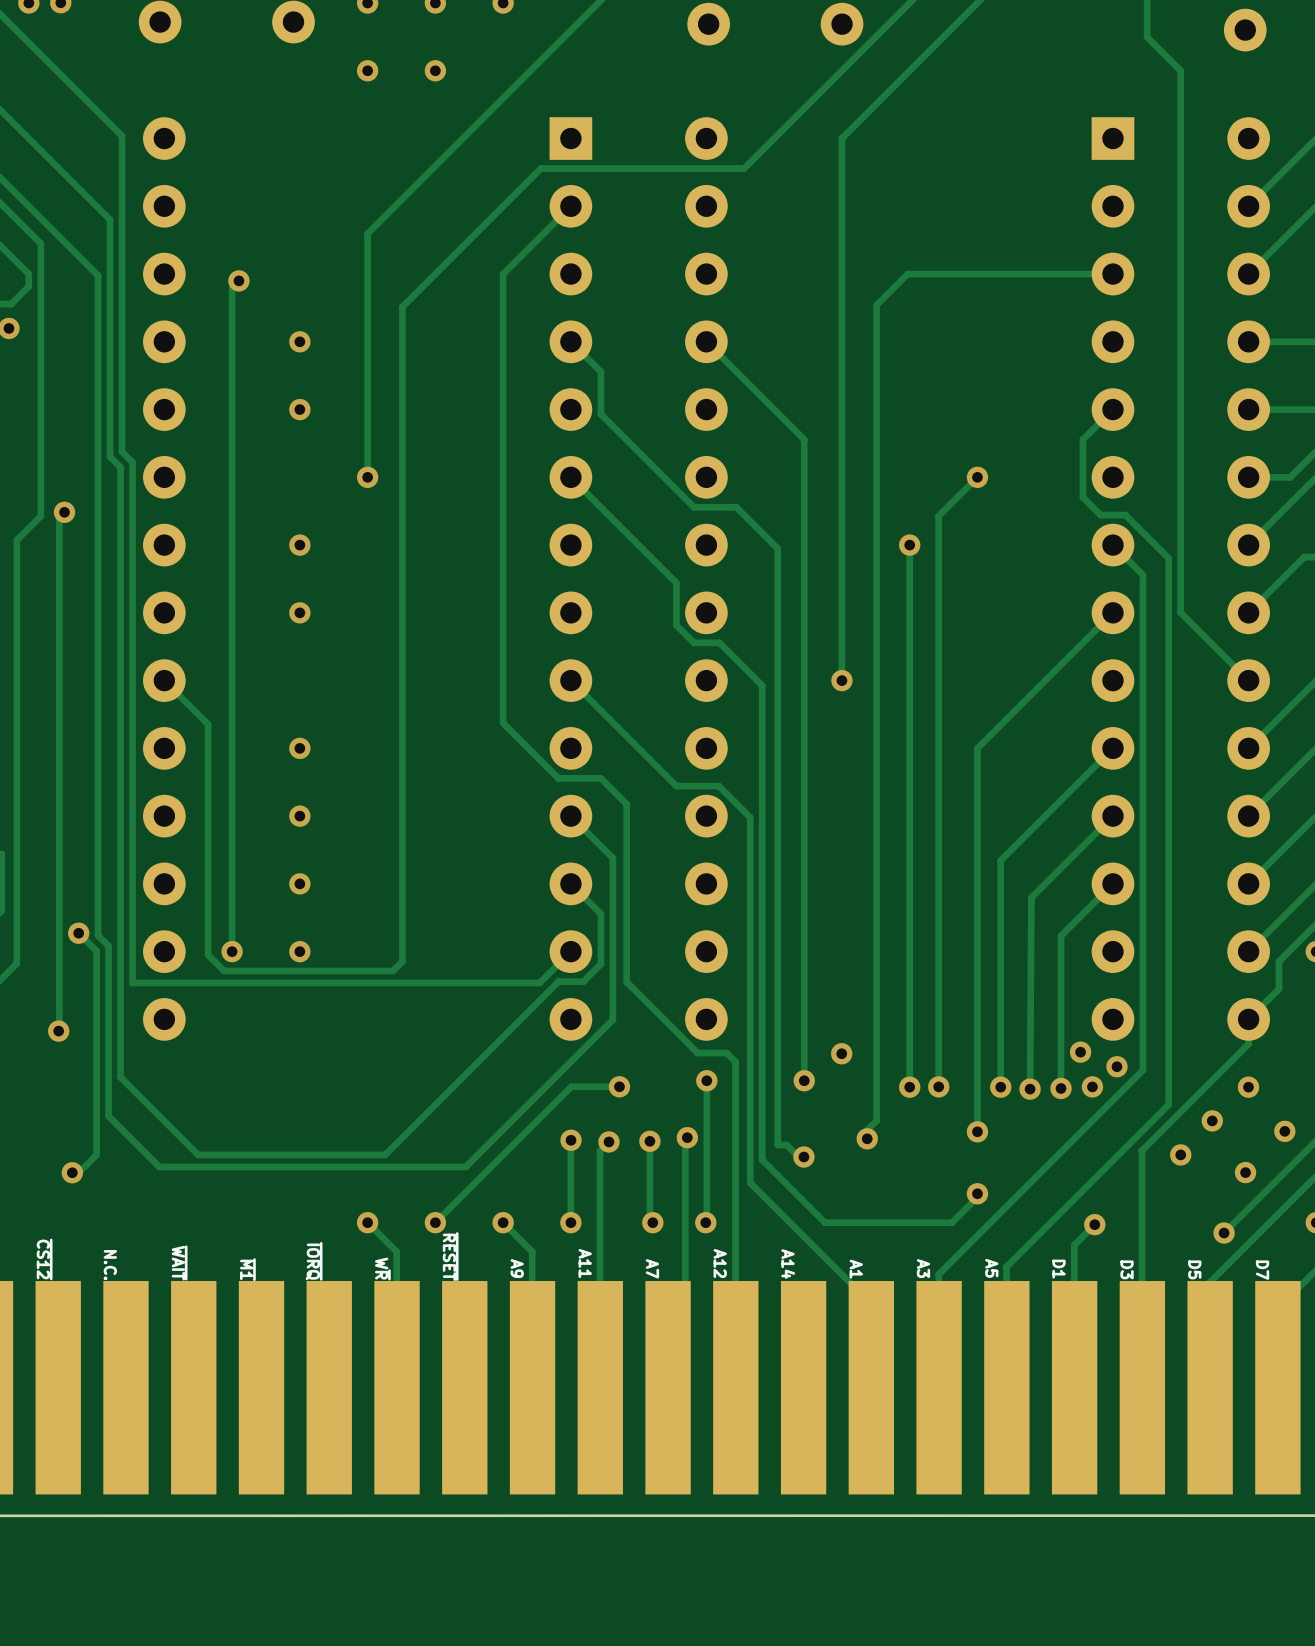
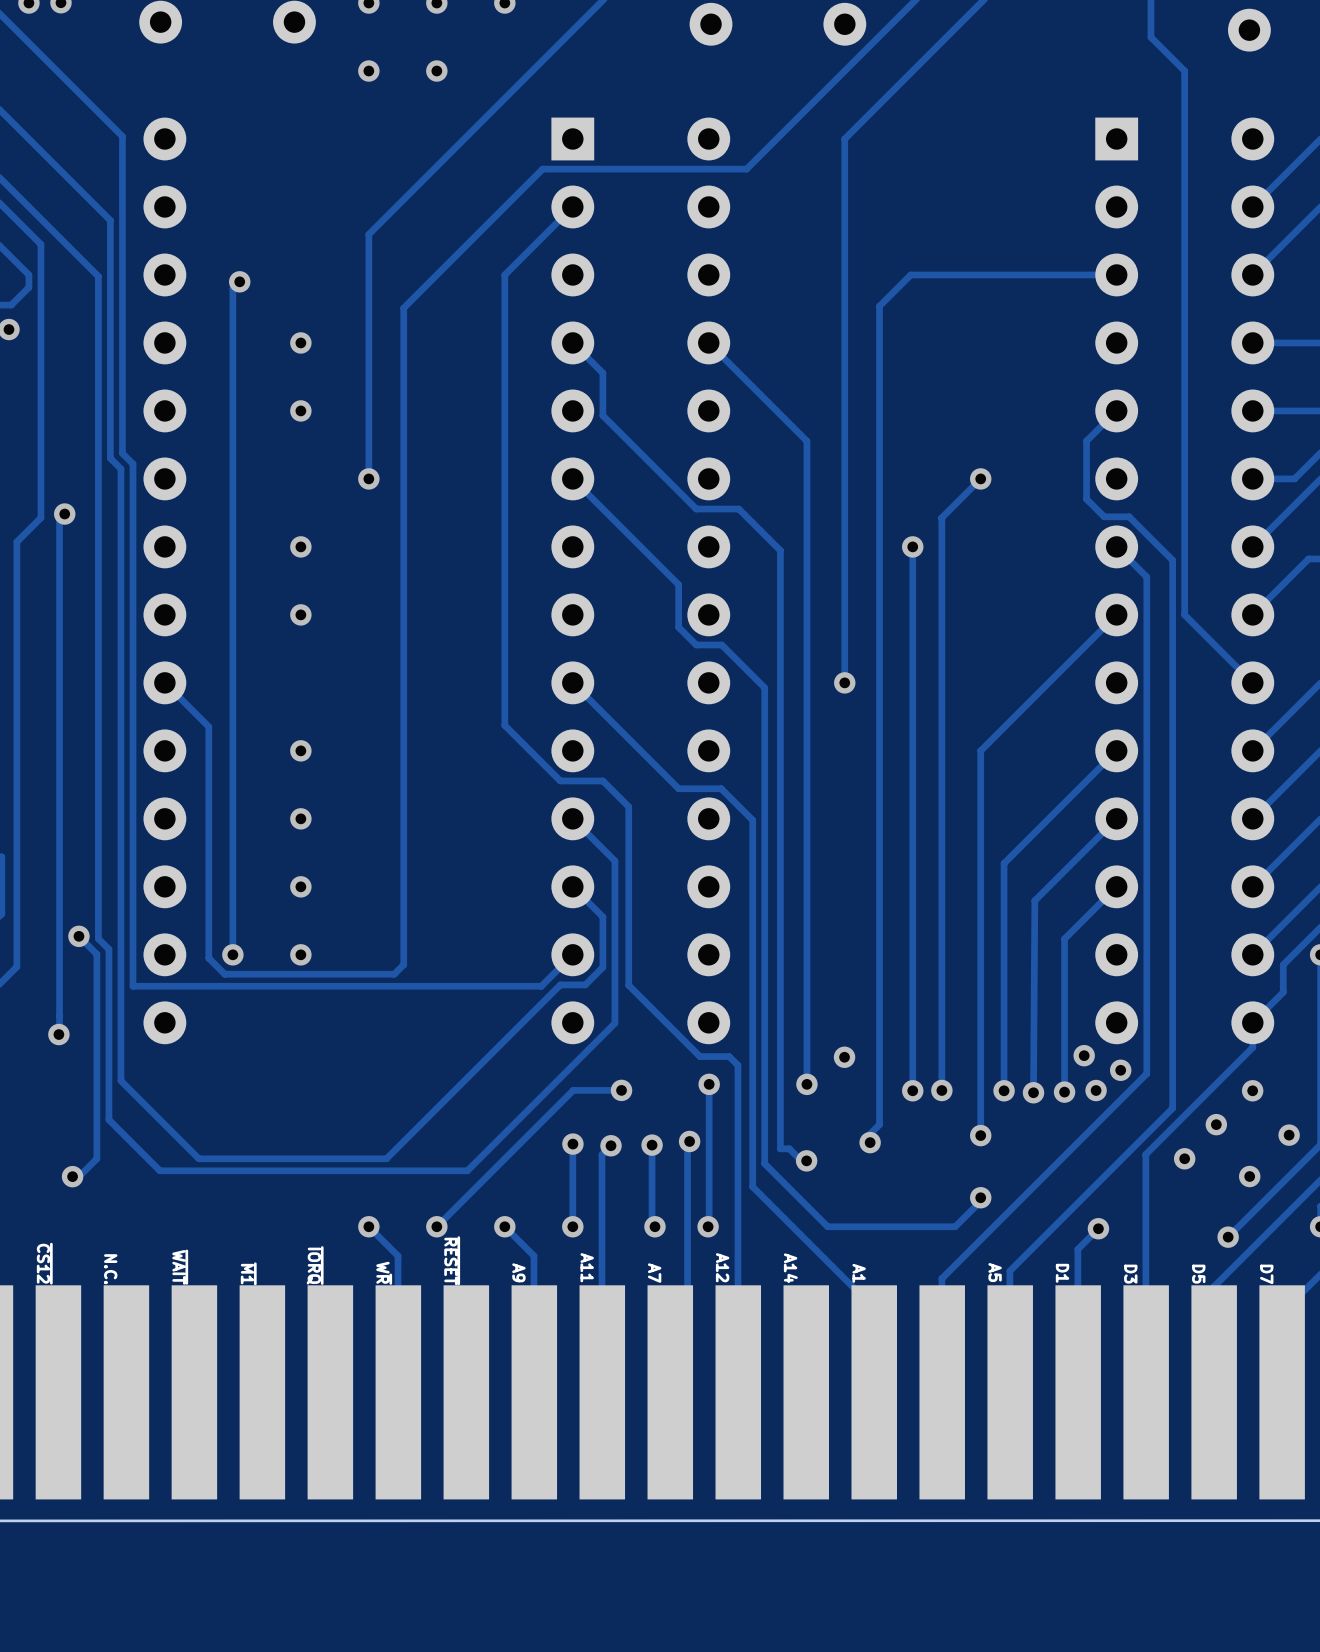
part text: A3 (923, 1268) -> none

